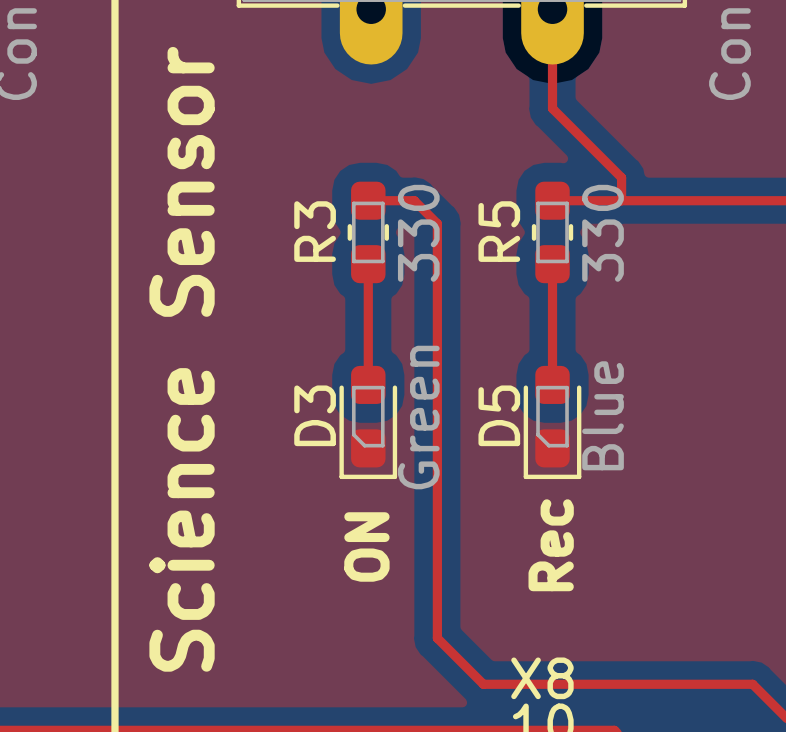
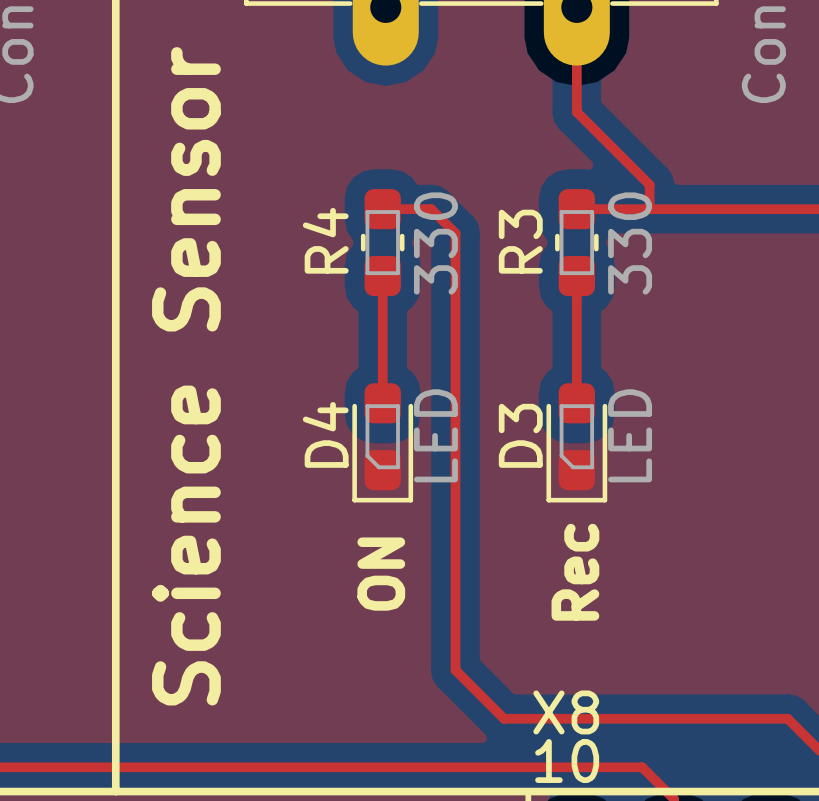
R3 name: R3 (315, 231) -> R4 (325, 240)
R5 name: R5 (499, 231) -> R3 (520, 241)
D3 name: D3 (315, 415) -> D4 (325, 434)
D5 name: D5 (499, 415) -> D3 (520, 435)
D5 value: Blue (603, 415) -> LED (630, 435)
D3 value: Green (418, 417) -> LED (435, 435)

